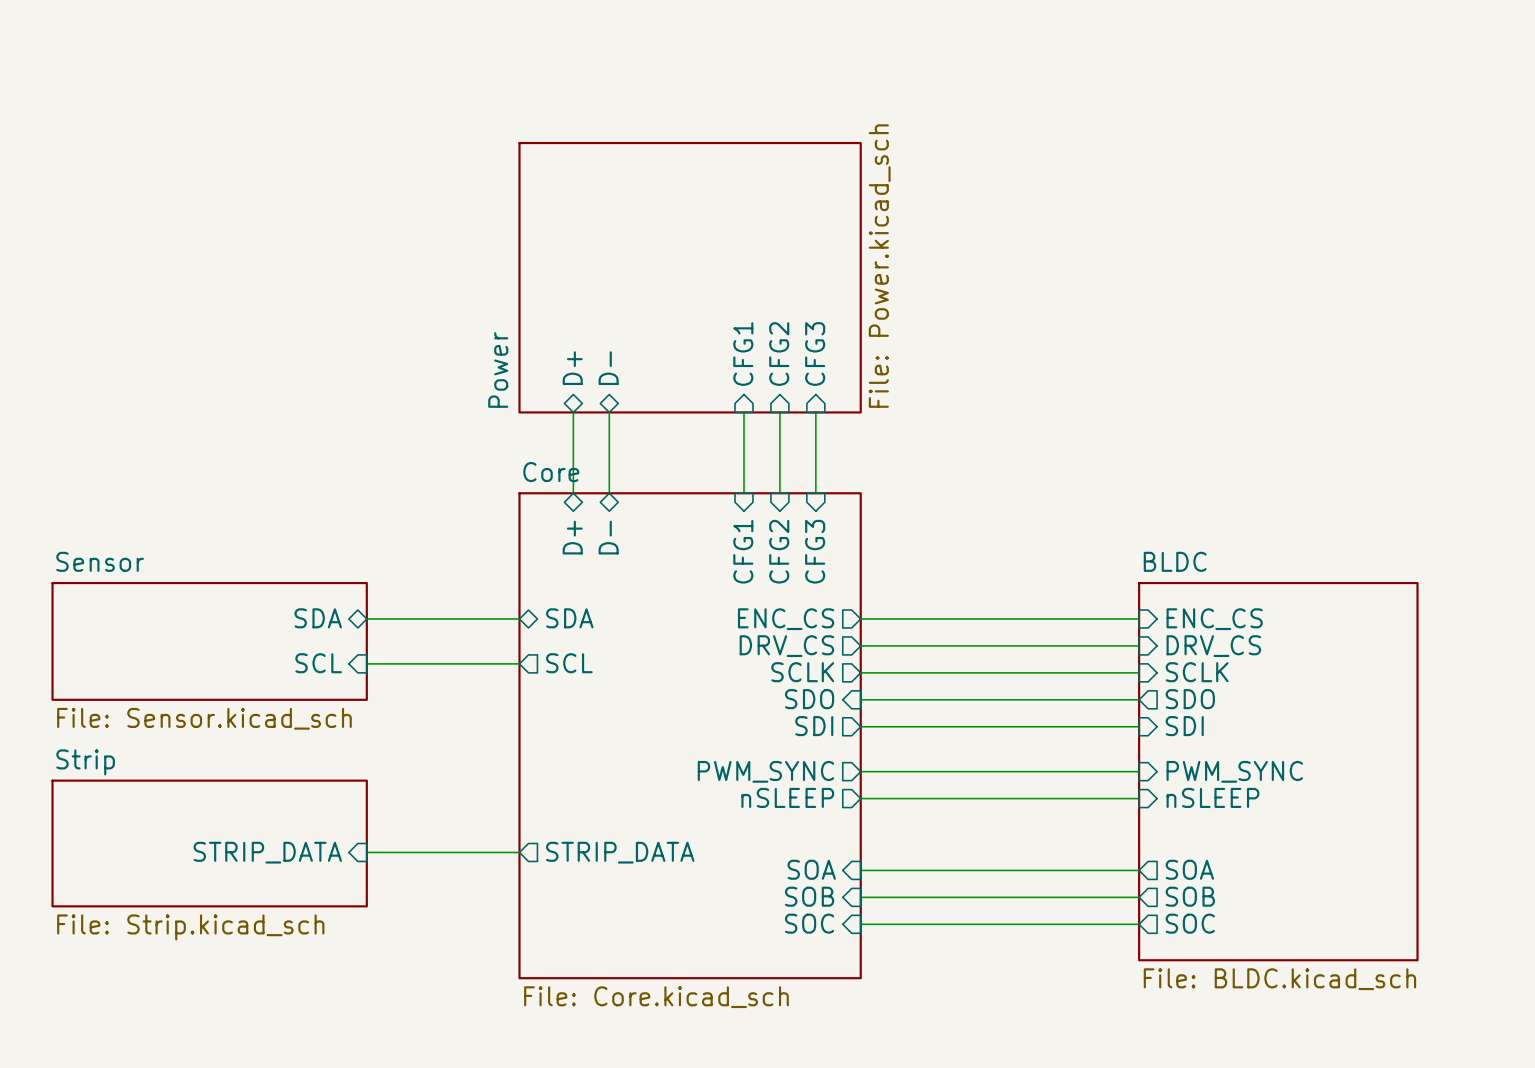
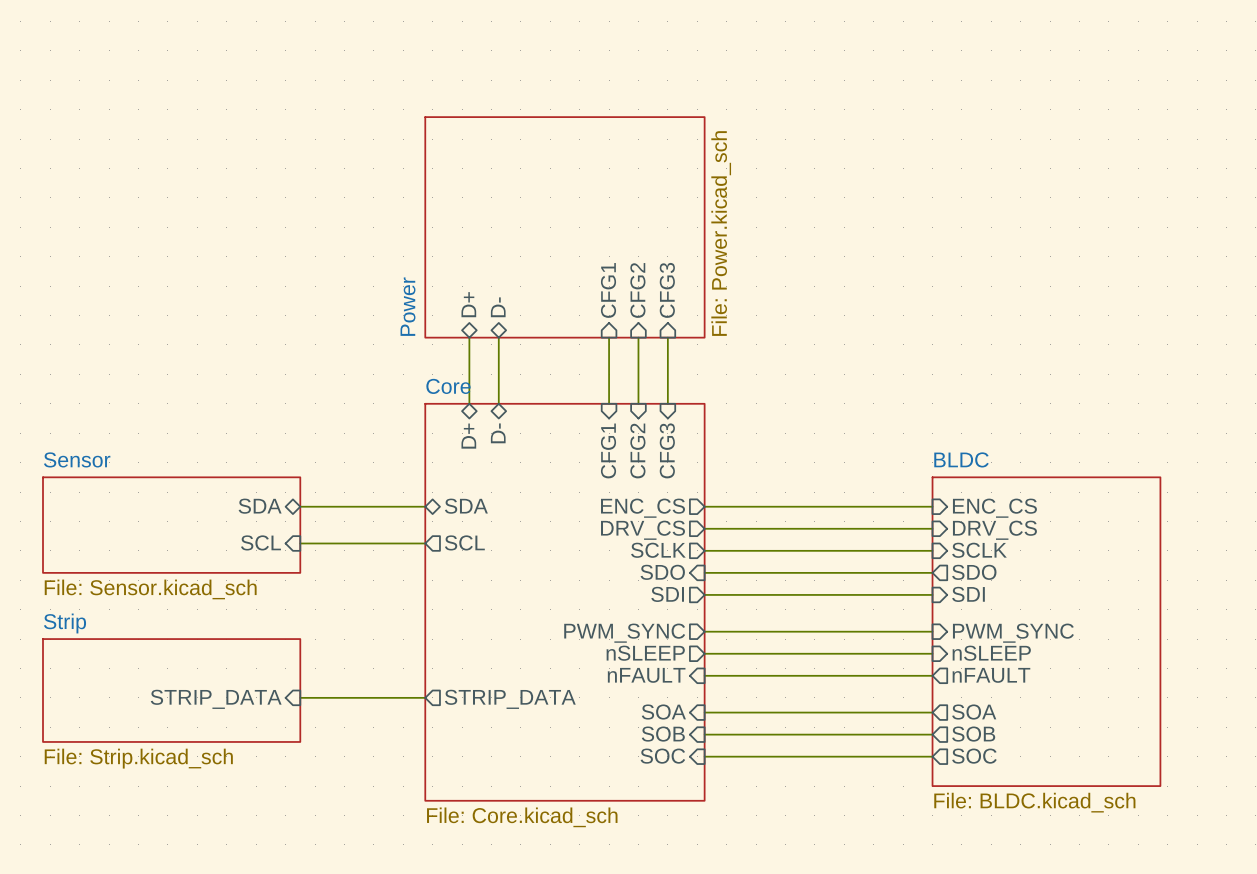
sheet pin: none -> nFAULT (646, 675)
sheet pin: none -> nFAULT (991, 675)
wire: none -> (704, 675) (932, 675)

